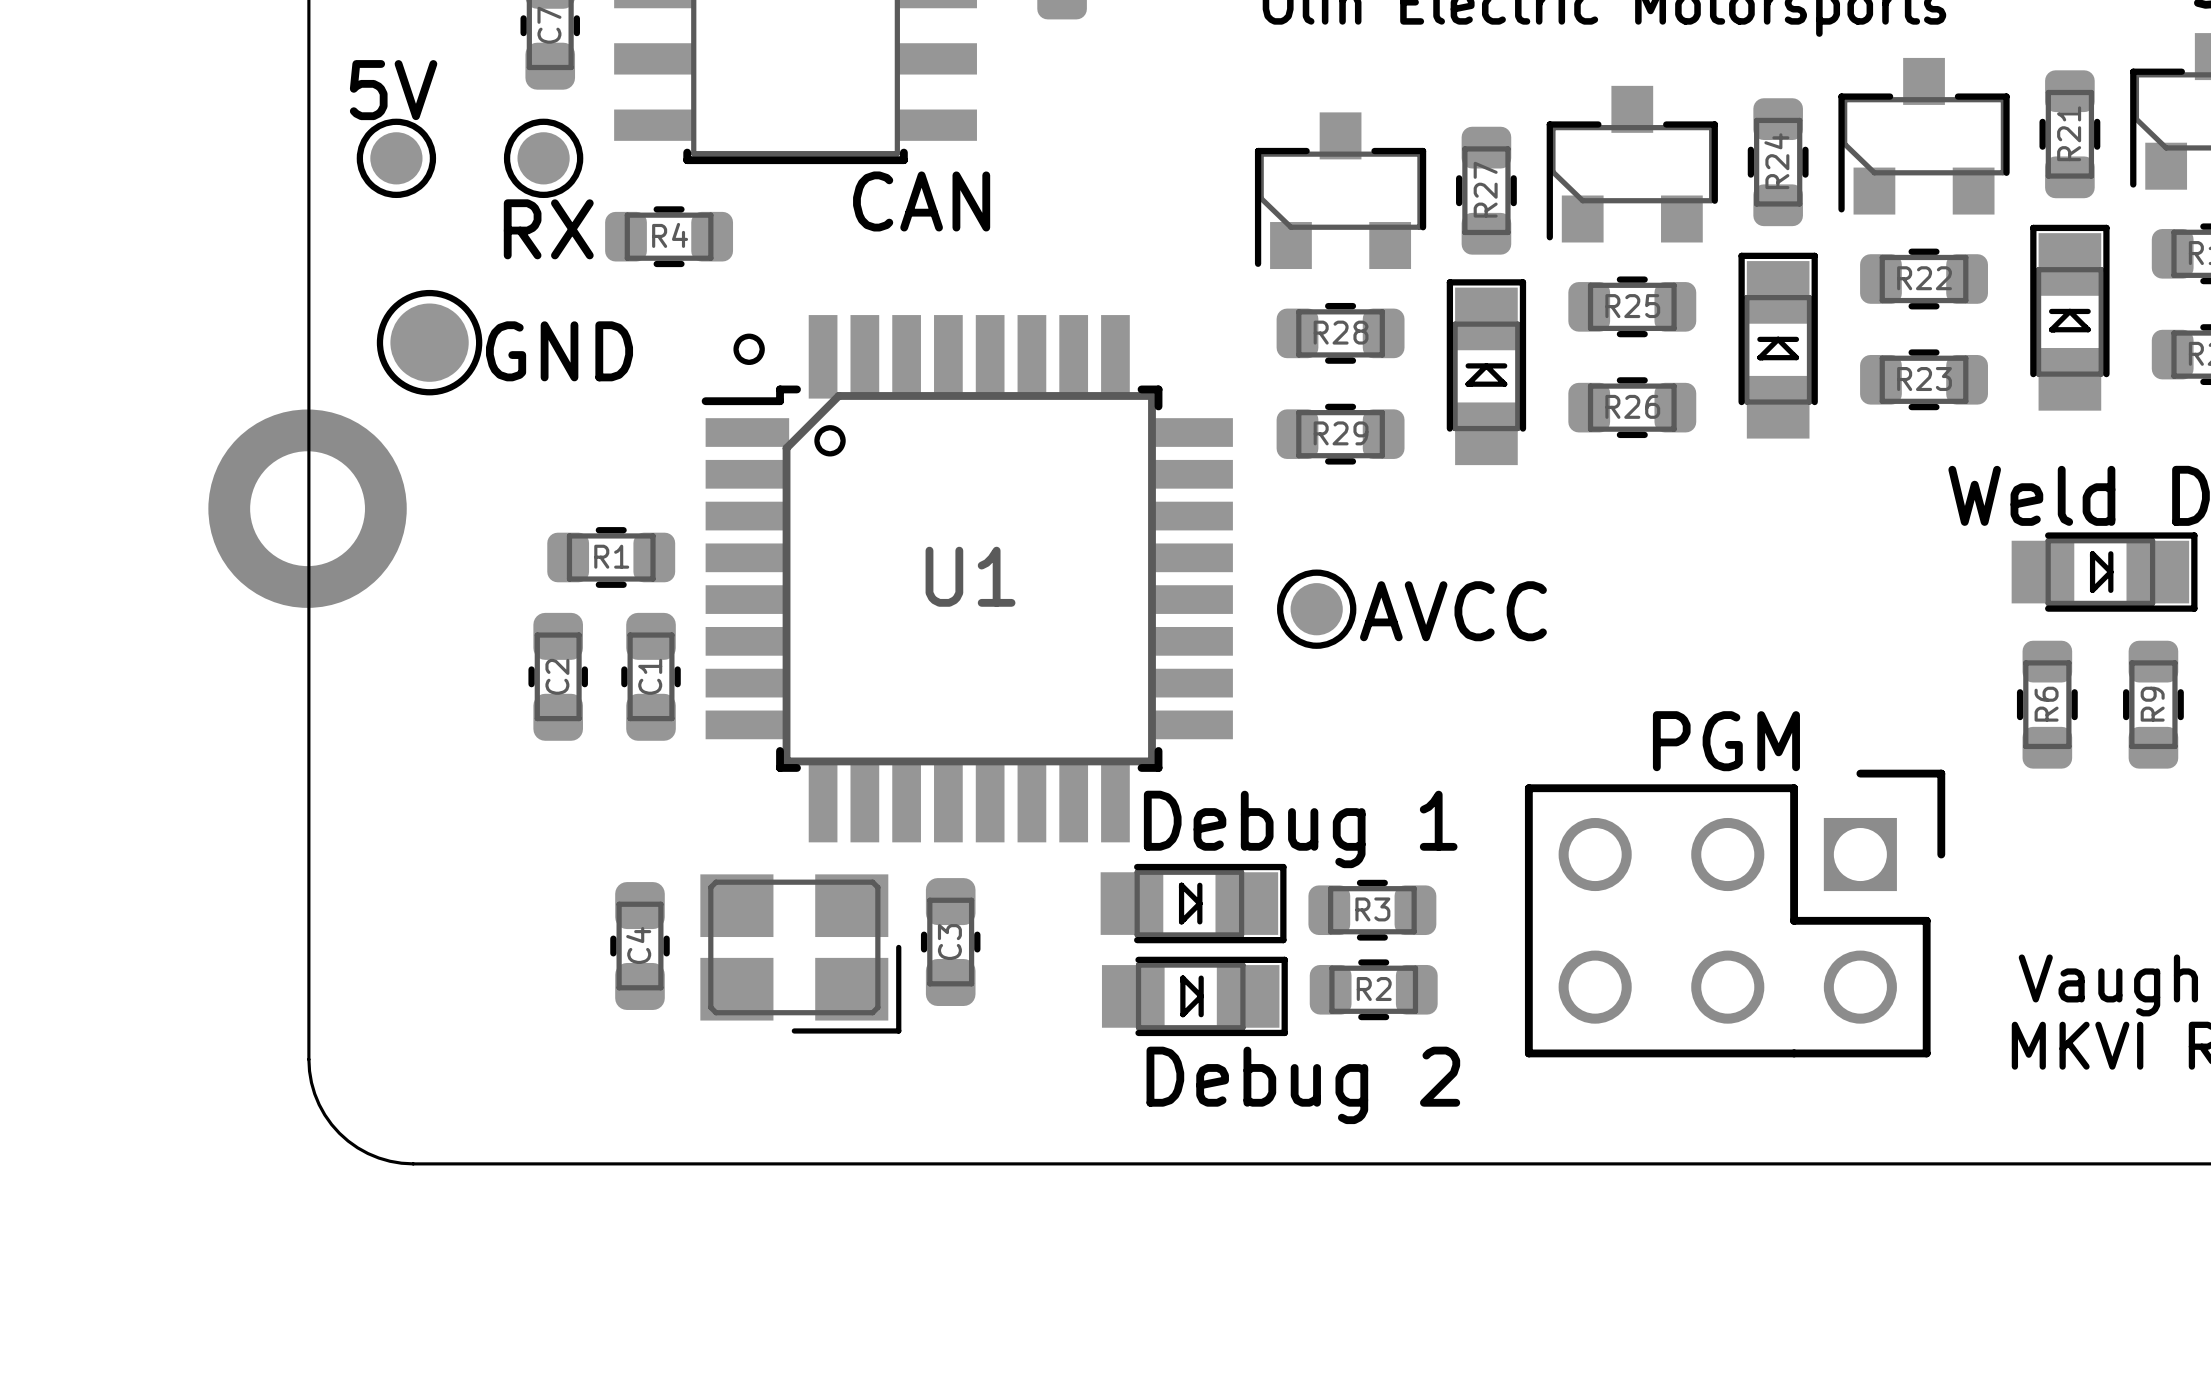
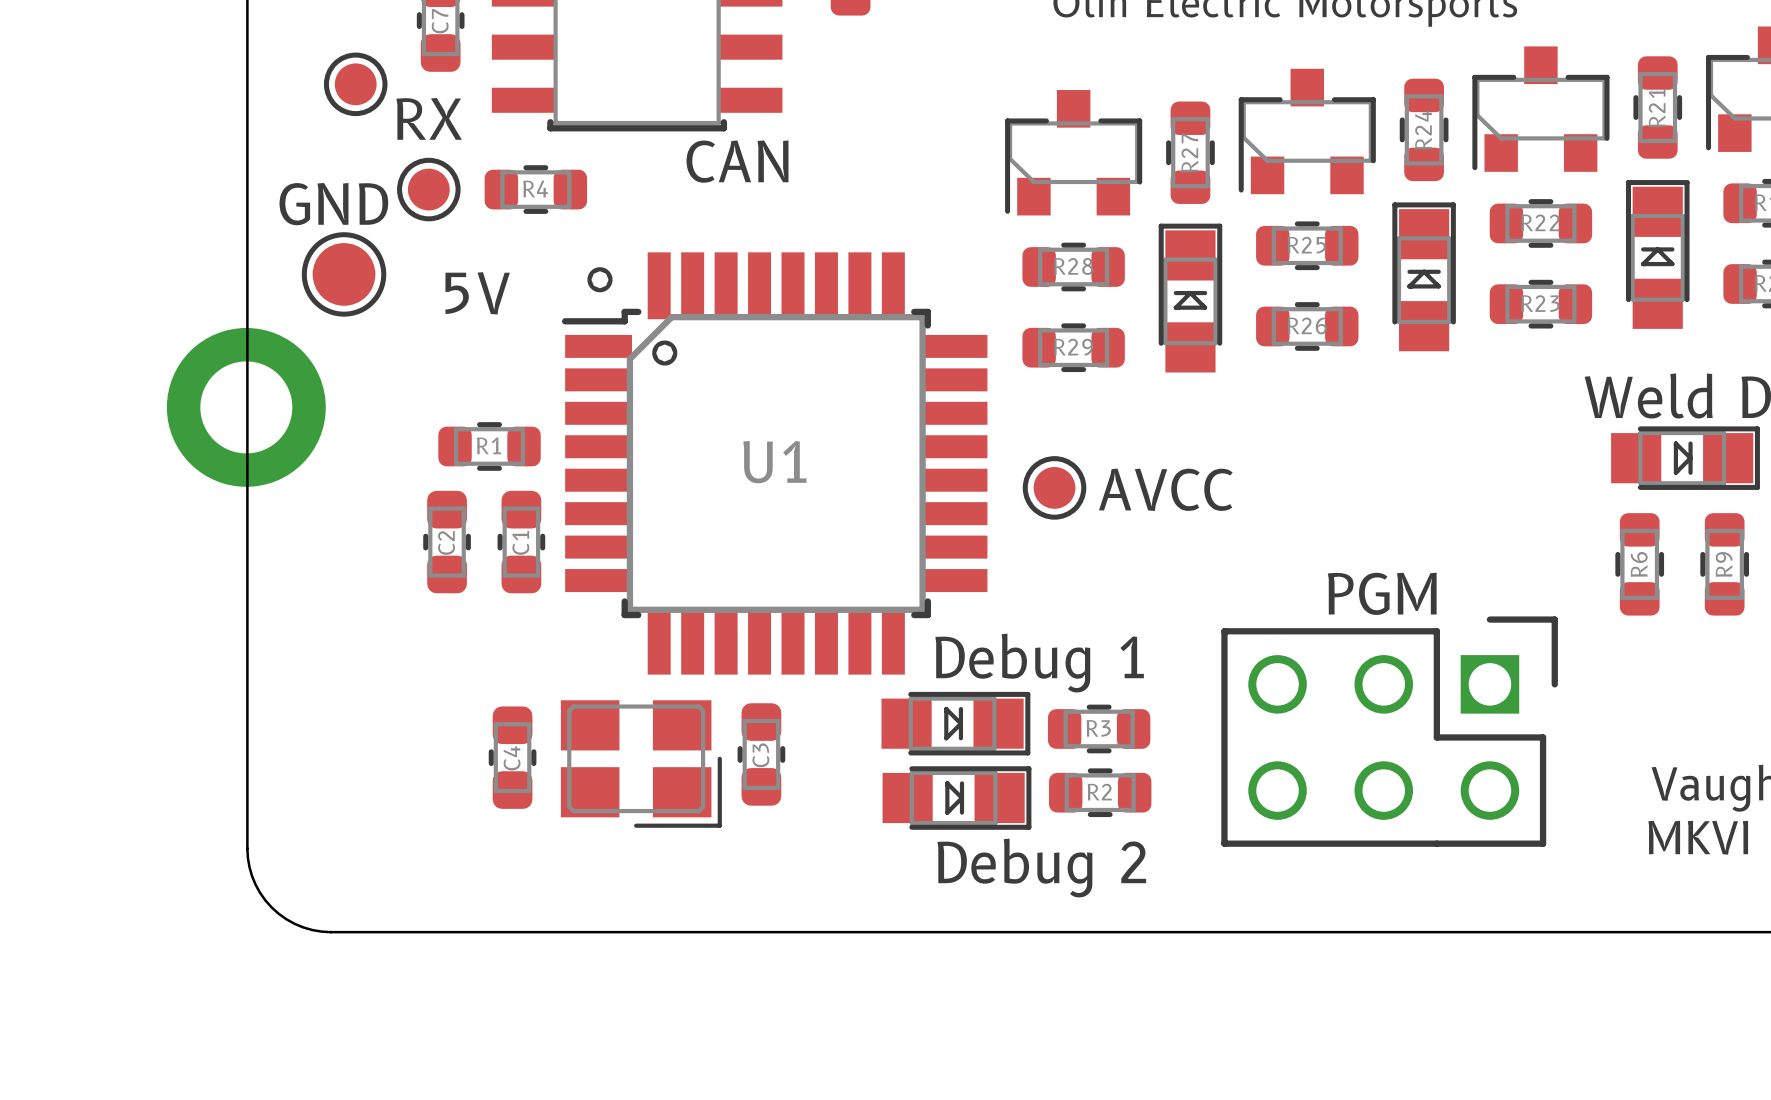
text: 5V (393, 90) -> none
part: none -> (355, 84)
part: (396, 158) -> none
part: (543, 158) -> none
text position: RX (548, 229) -> RX (429, 118)
part: none -> (428, 189)
text: none -> GND (333, 204)
text: GND (559, 351) -> 5V (477, 293)

